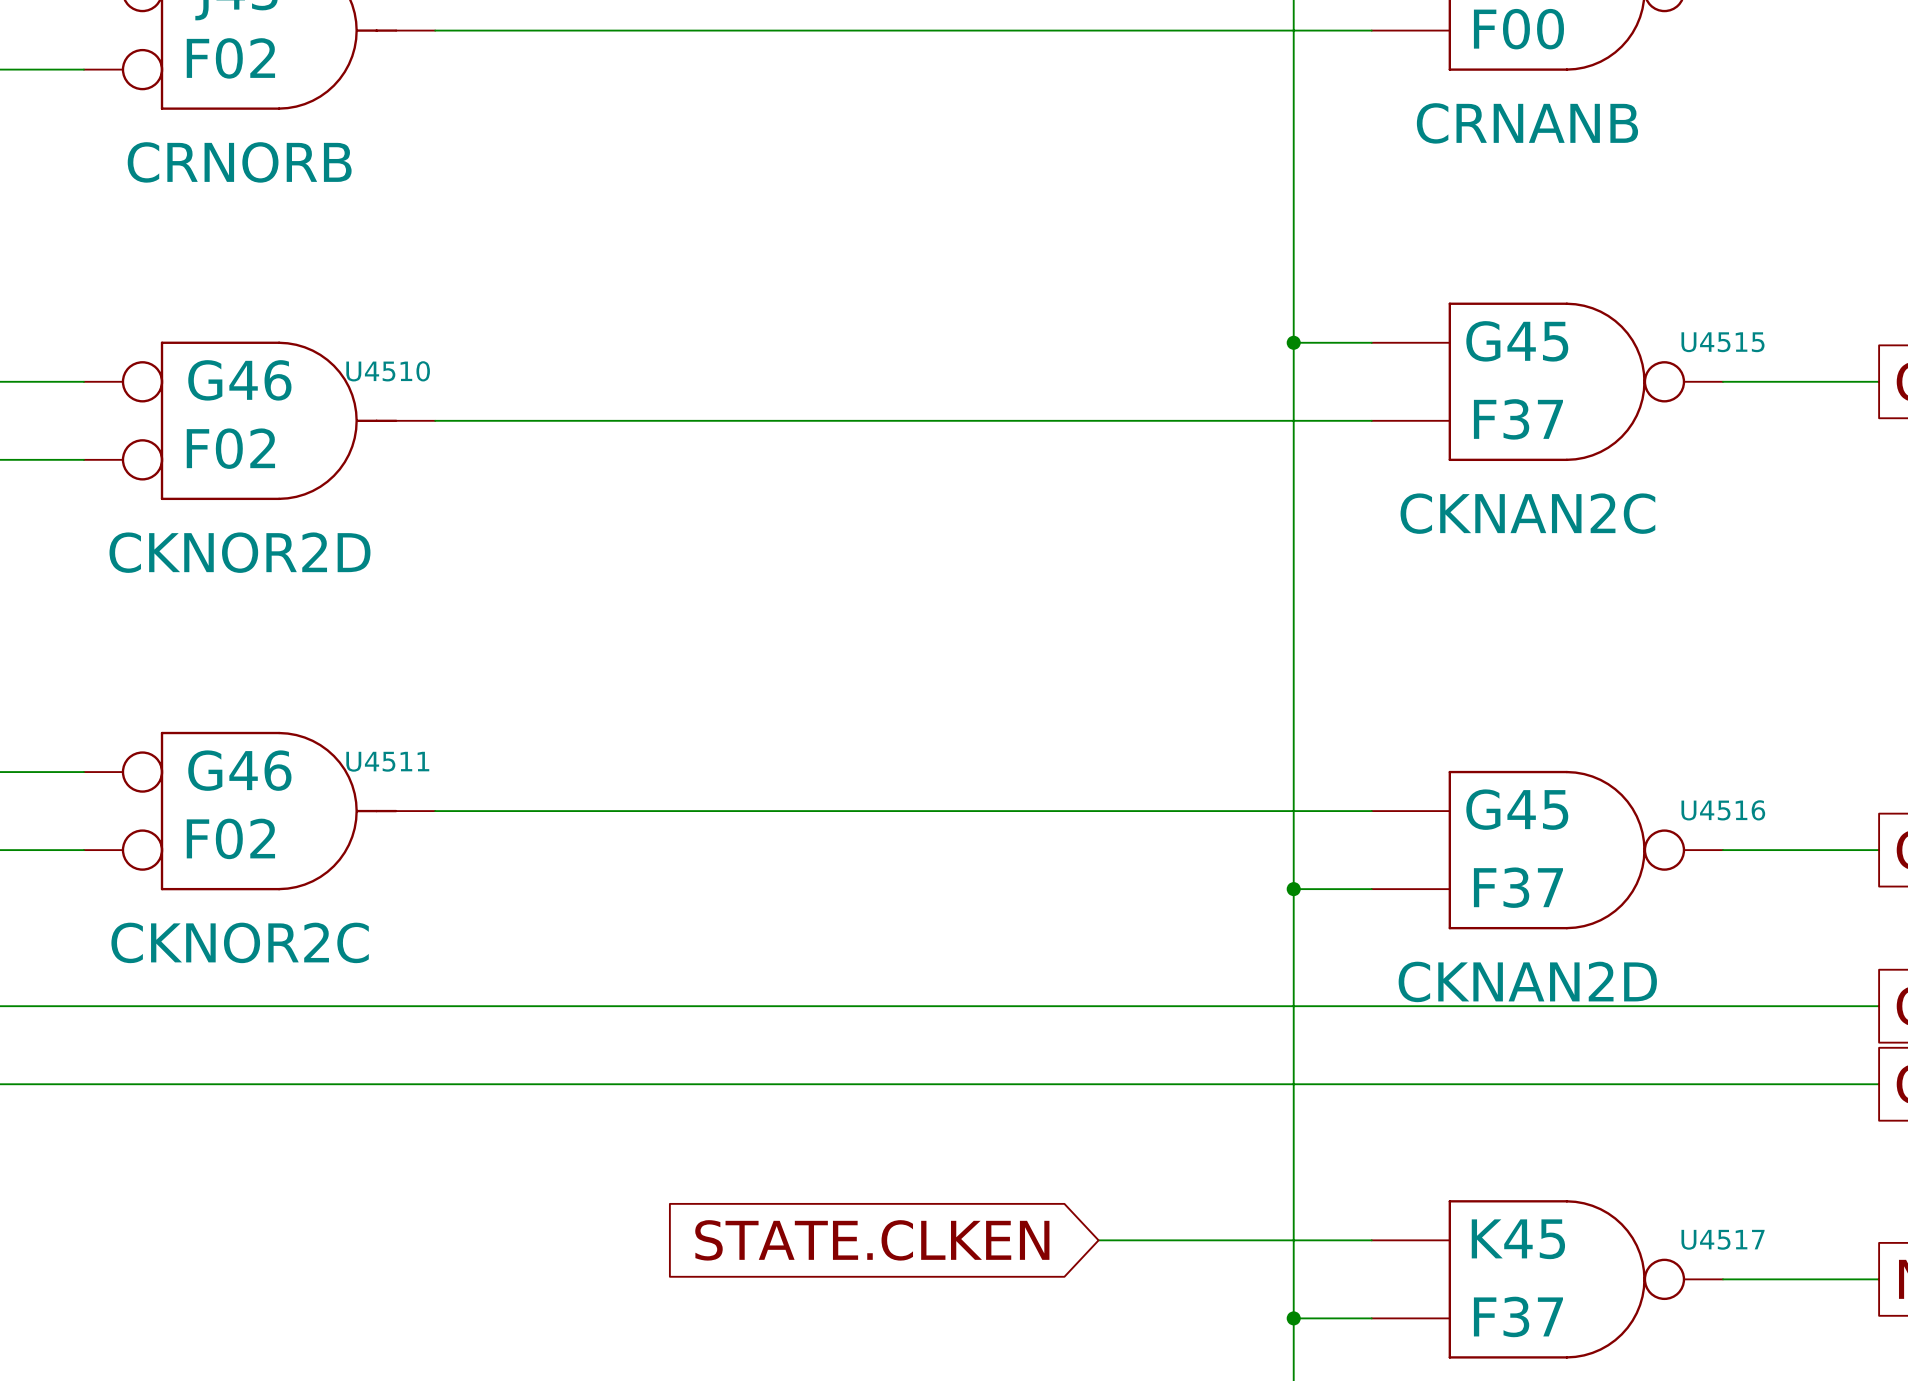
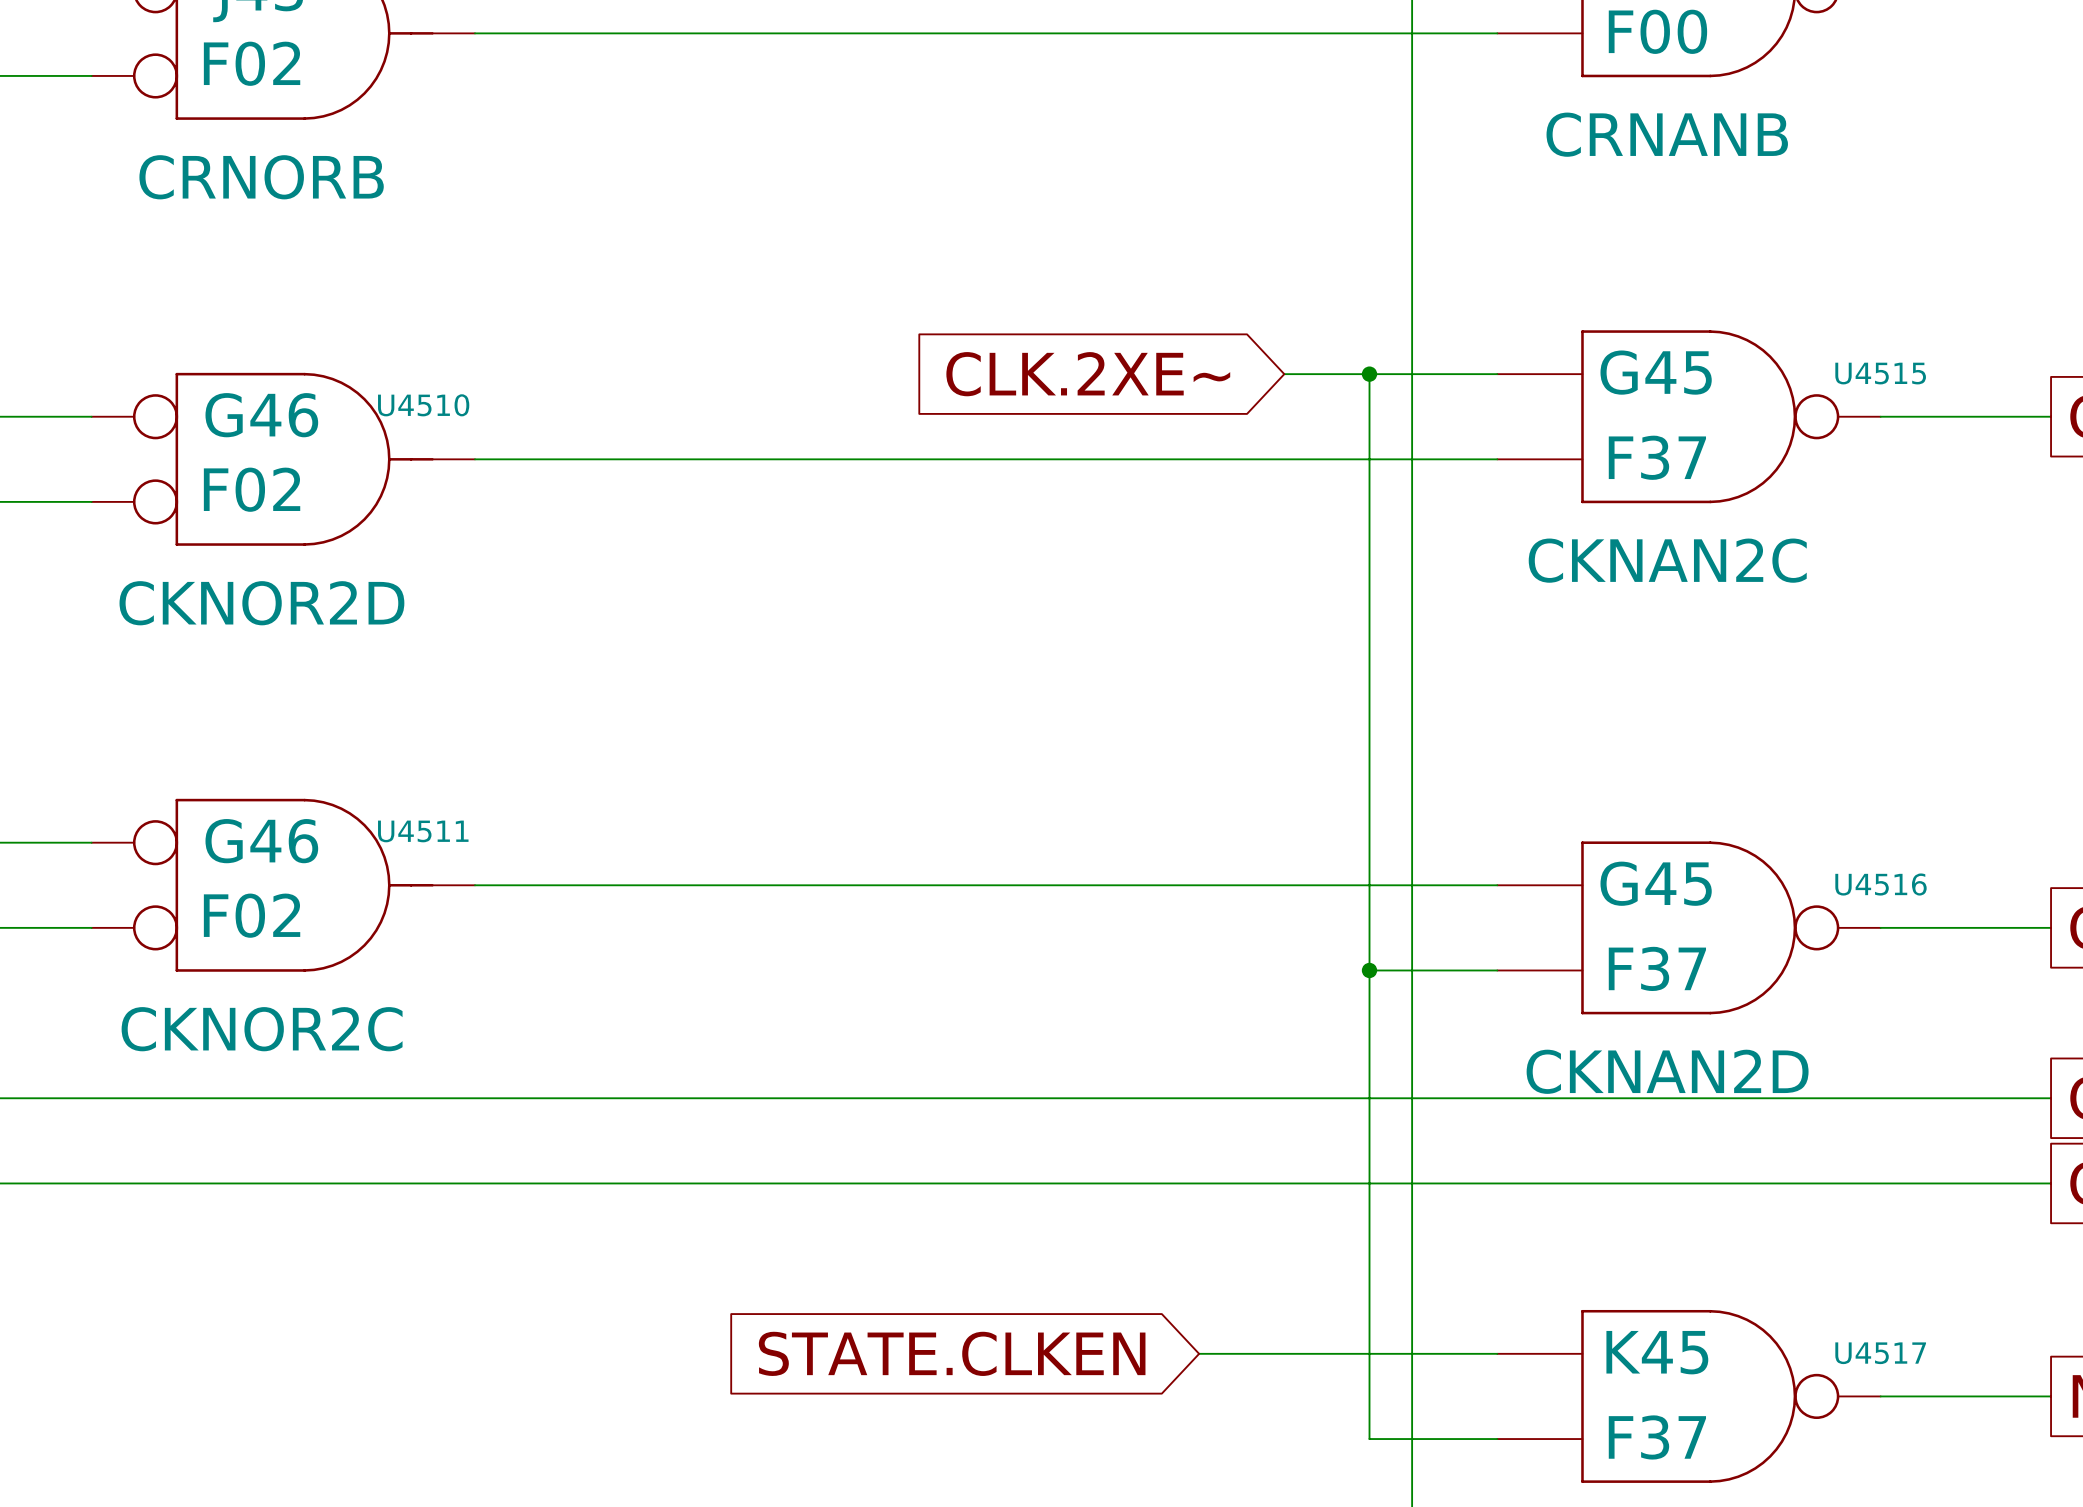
global label: none -> CLK.2XE~ (1088, 374)
wire: none -> (1284, 374) (1412, 374)
wire: none -> (1369, 374) (1369, 1439) (1412, 1439)
junction position: (1293, 342) -> (1369, 374)
wire: none -> (1369, 970) (1412, 970)
junction position: (1293, 889) -> (1369, 970)
junction: (1293, 1318) -> none

